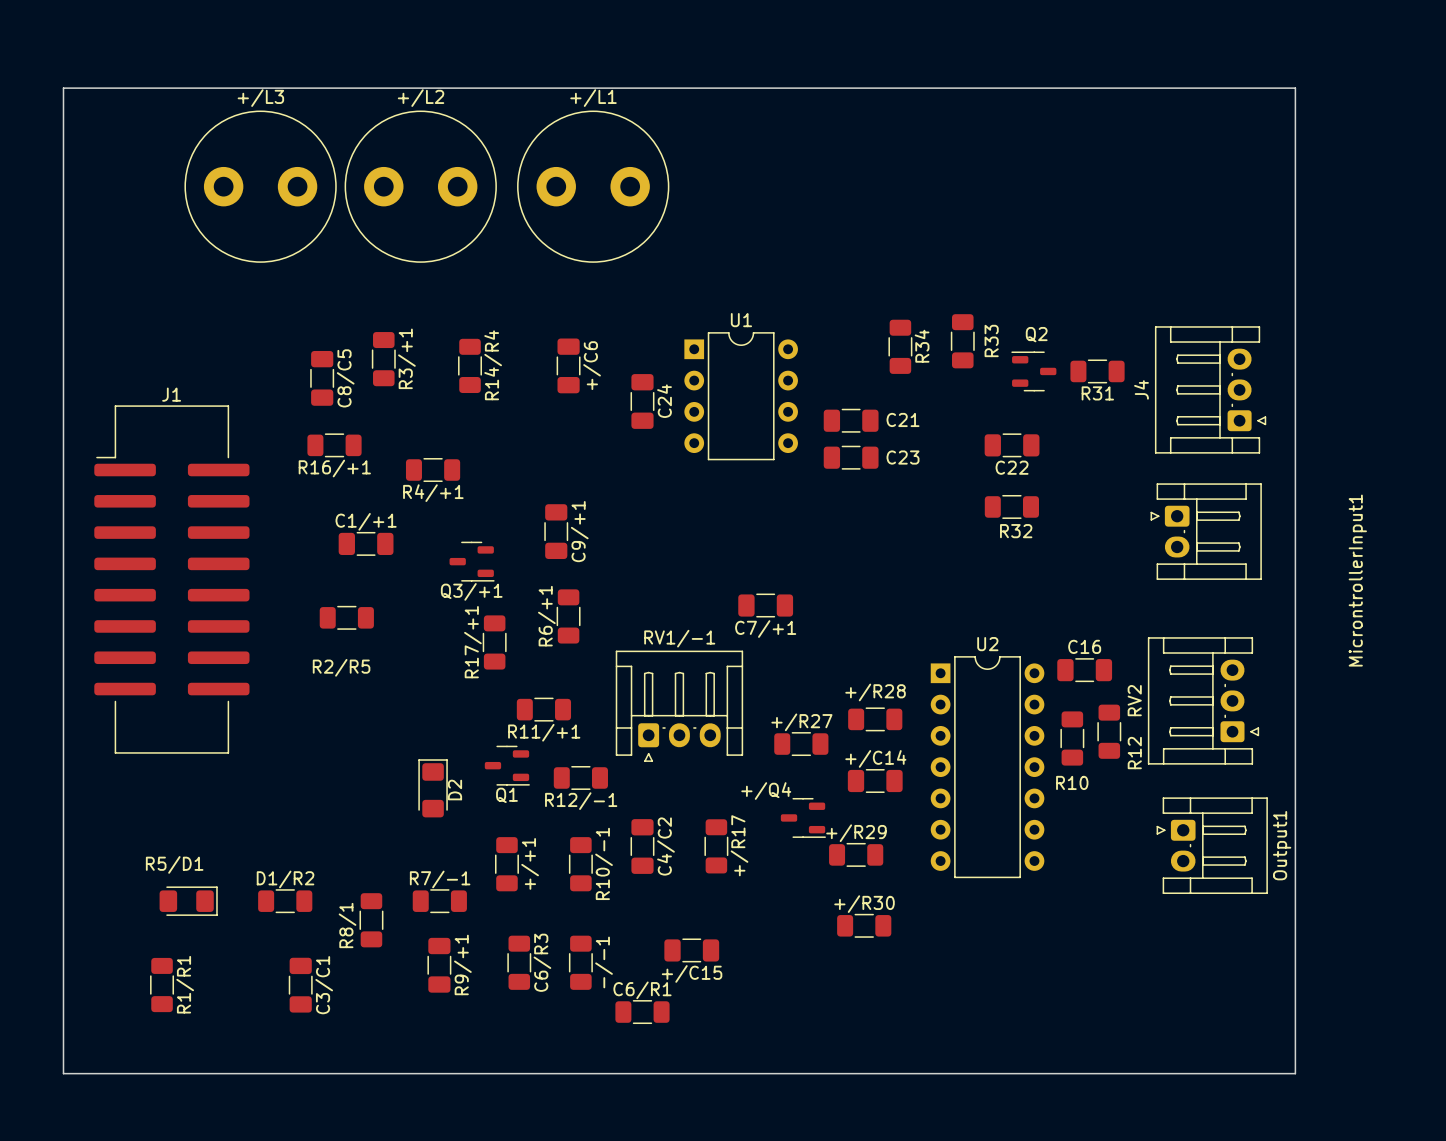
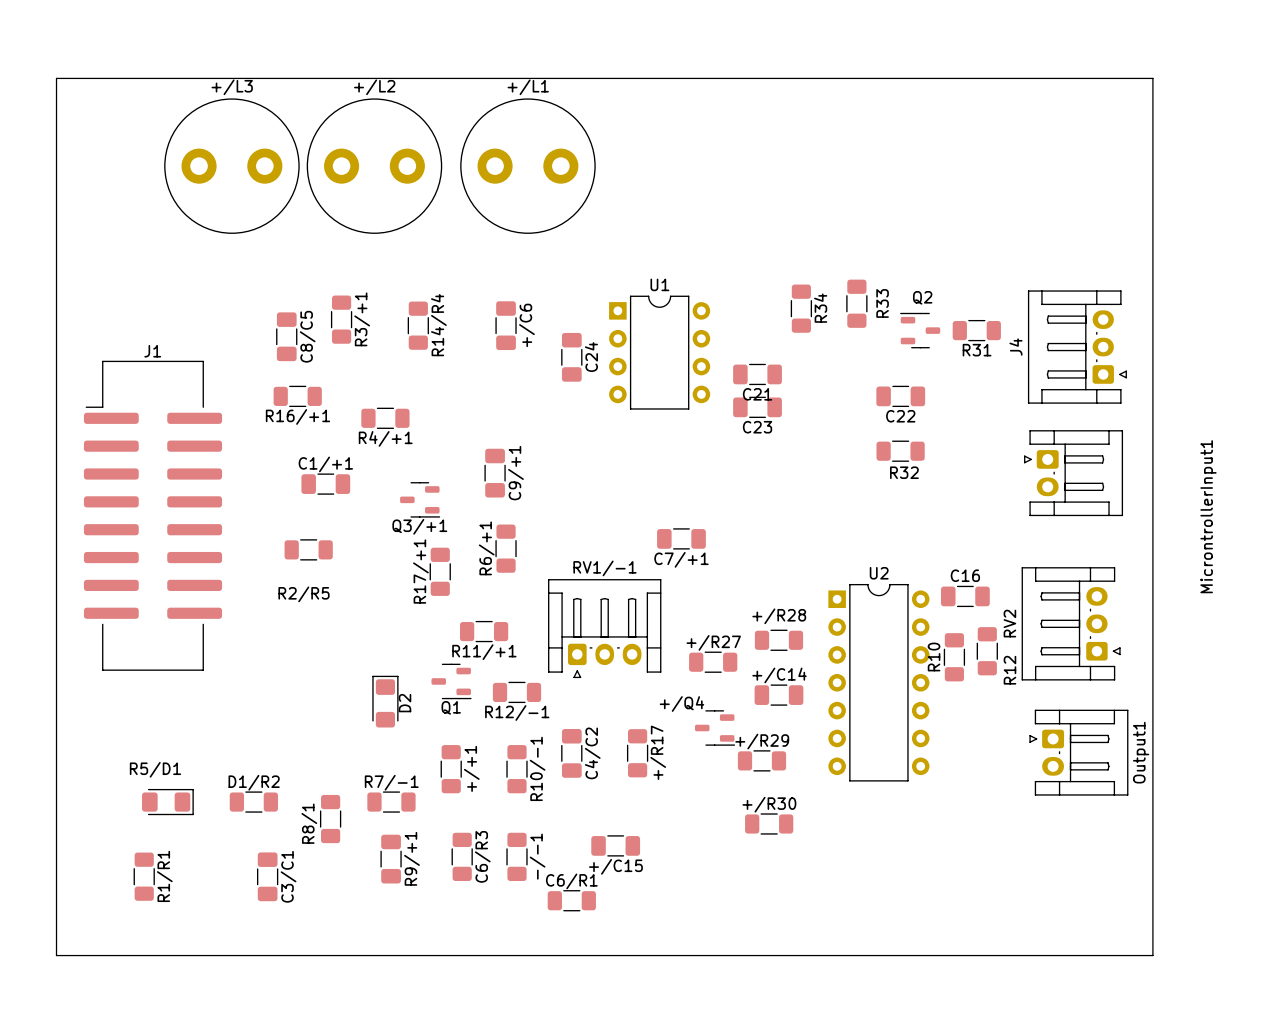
C21 name position: C21 (903, 419) -> C21 (757, 394)
C23 name position: C23 (903, 457) -> C23 (757, 427)
R10 name rotation: 0° (1072, 782) -> 90° counterclockwise (934, 657)
R10 name position: R10 (1072, 782) -> R10 (934, 657)

